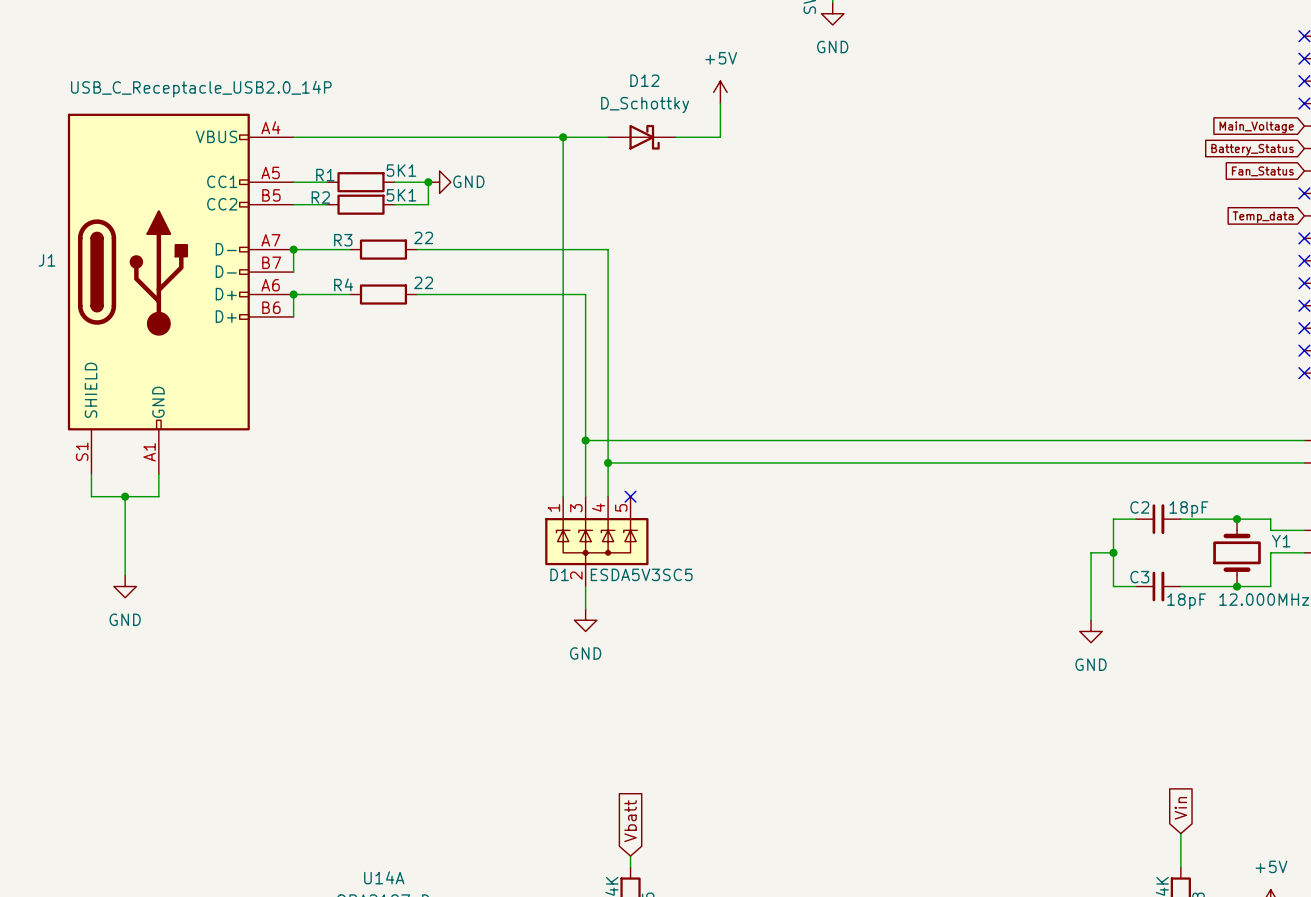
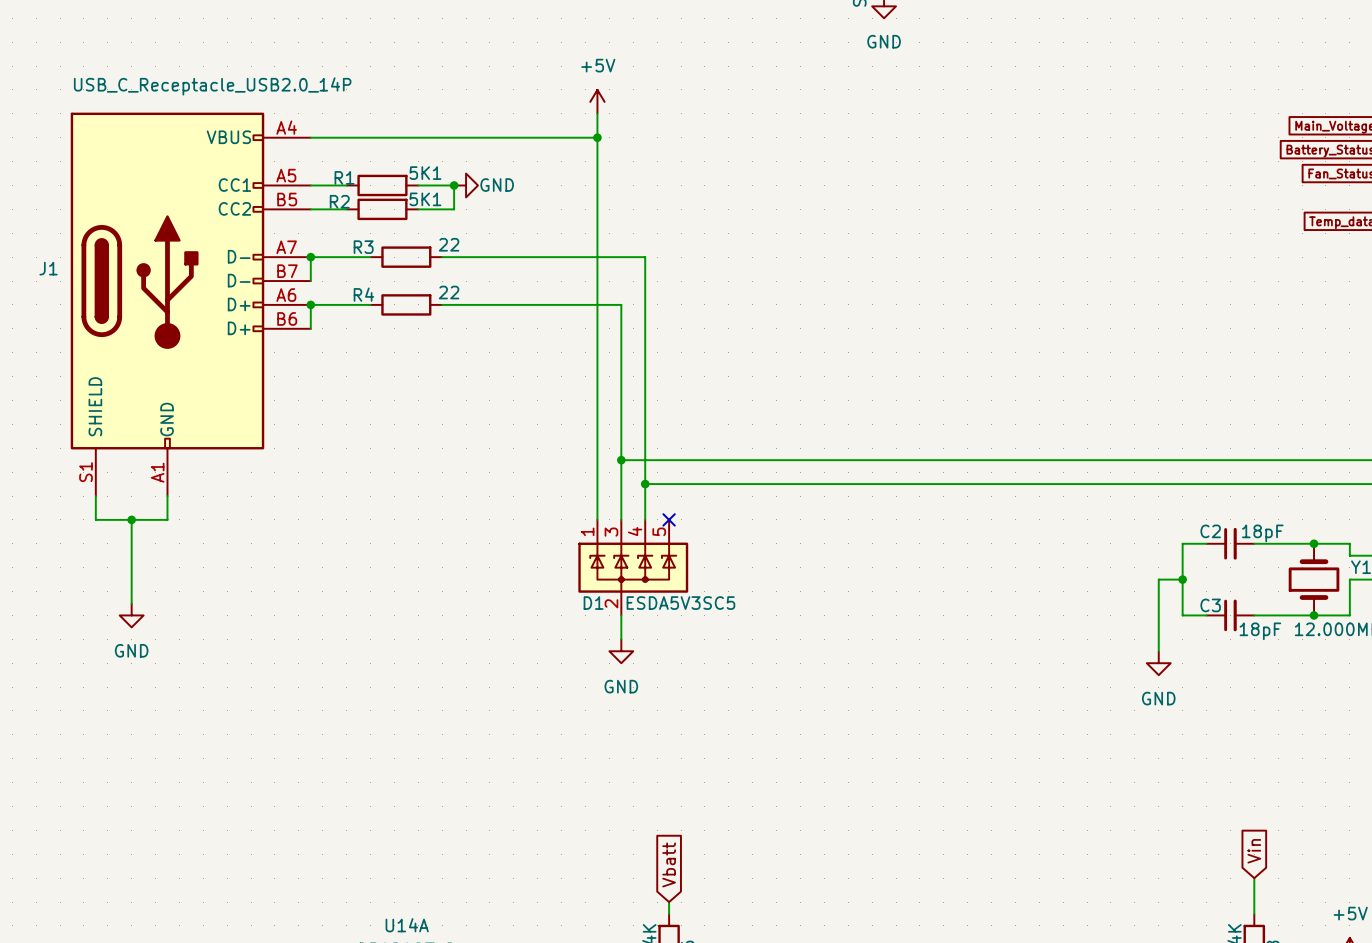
power symbol position: +5V (720, 92) -> +5V (597, 101)
wire: (720, 103) (720, 137) (675, 137) -> none
wire: (563, 137) (608, 137) -> (597, 137) (597, 113)
D12: D_Schottky (641, 137) -> none

